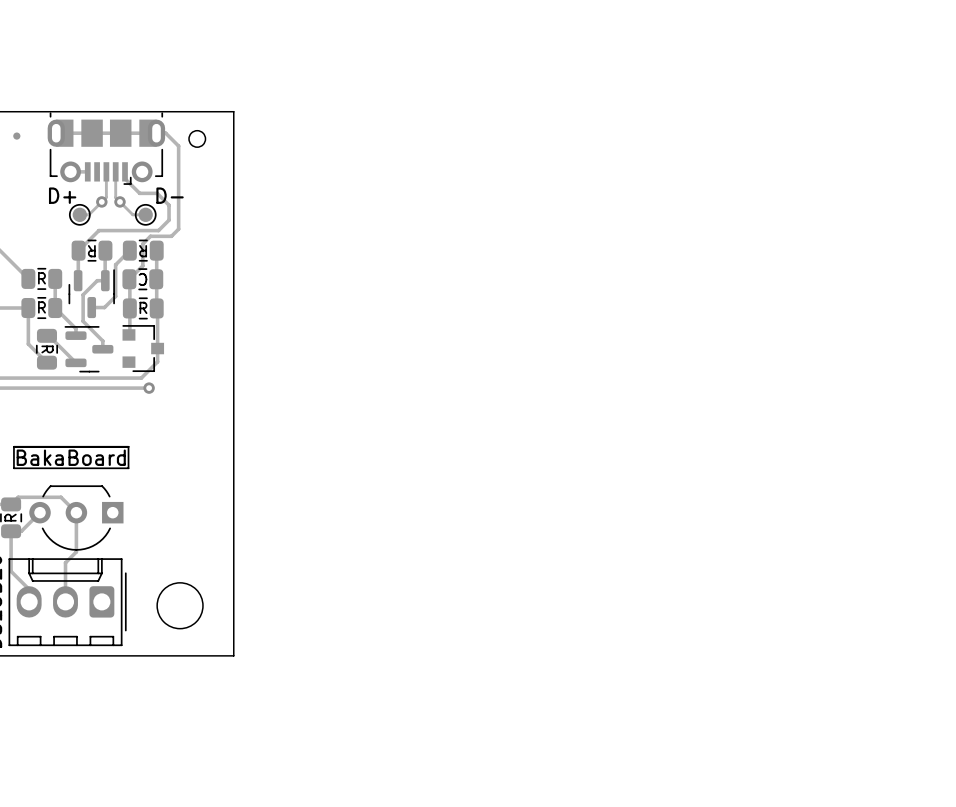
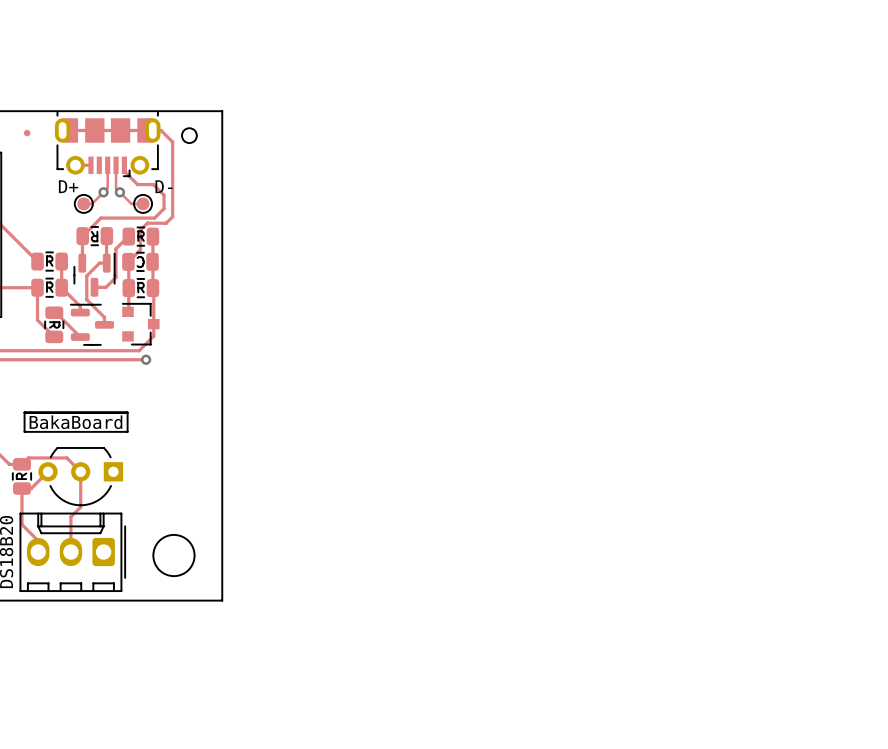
part rotation: 0° (143, 250) -> 180° (140, 236)

